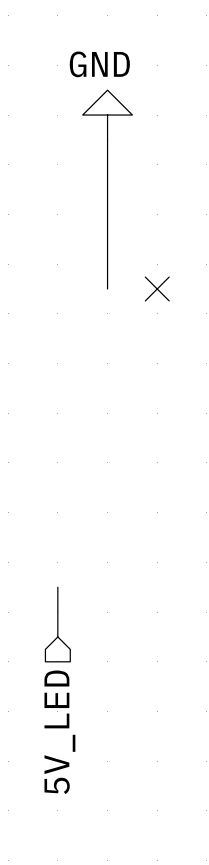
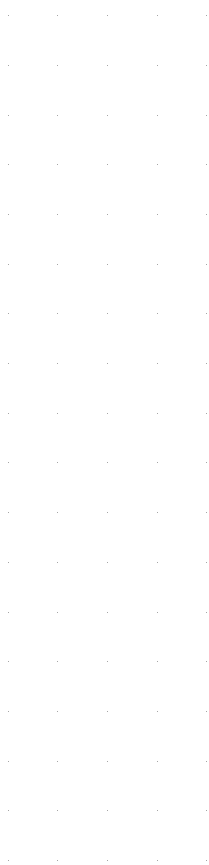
power symbol: GND (107, 115) -> none
wire: (107, 139) (107, 289) -> none
no-connect mark: (157, 289) -> none
wire: (57, 587) (57, 636) -> none
hierarchical label: 5V_LED (59, 732) -> none

